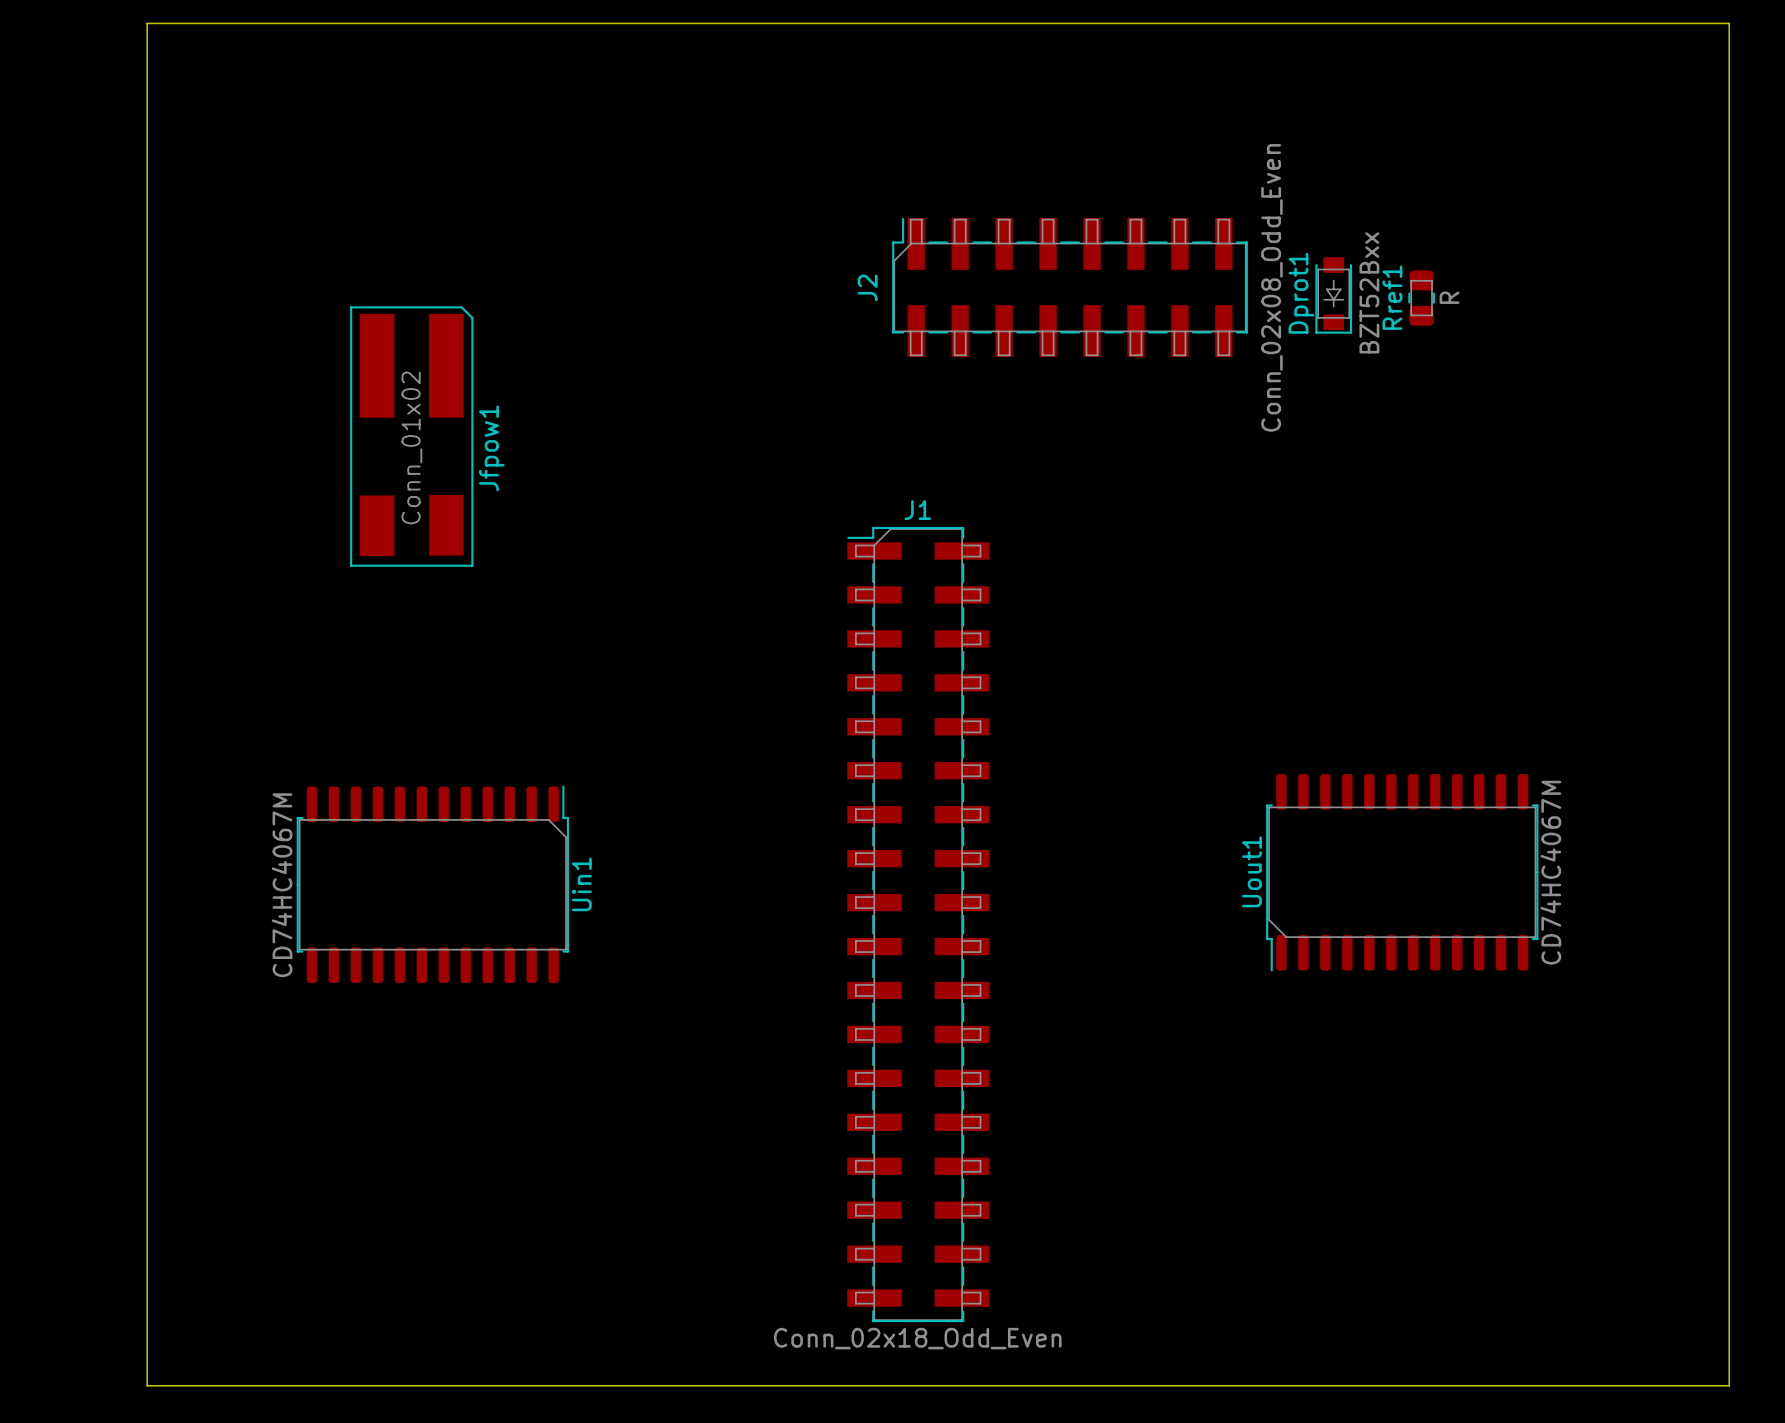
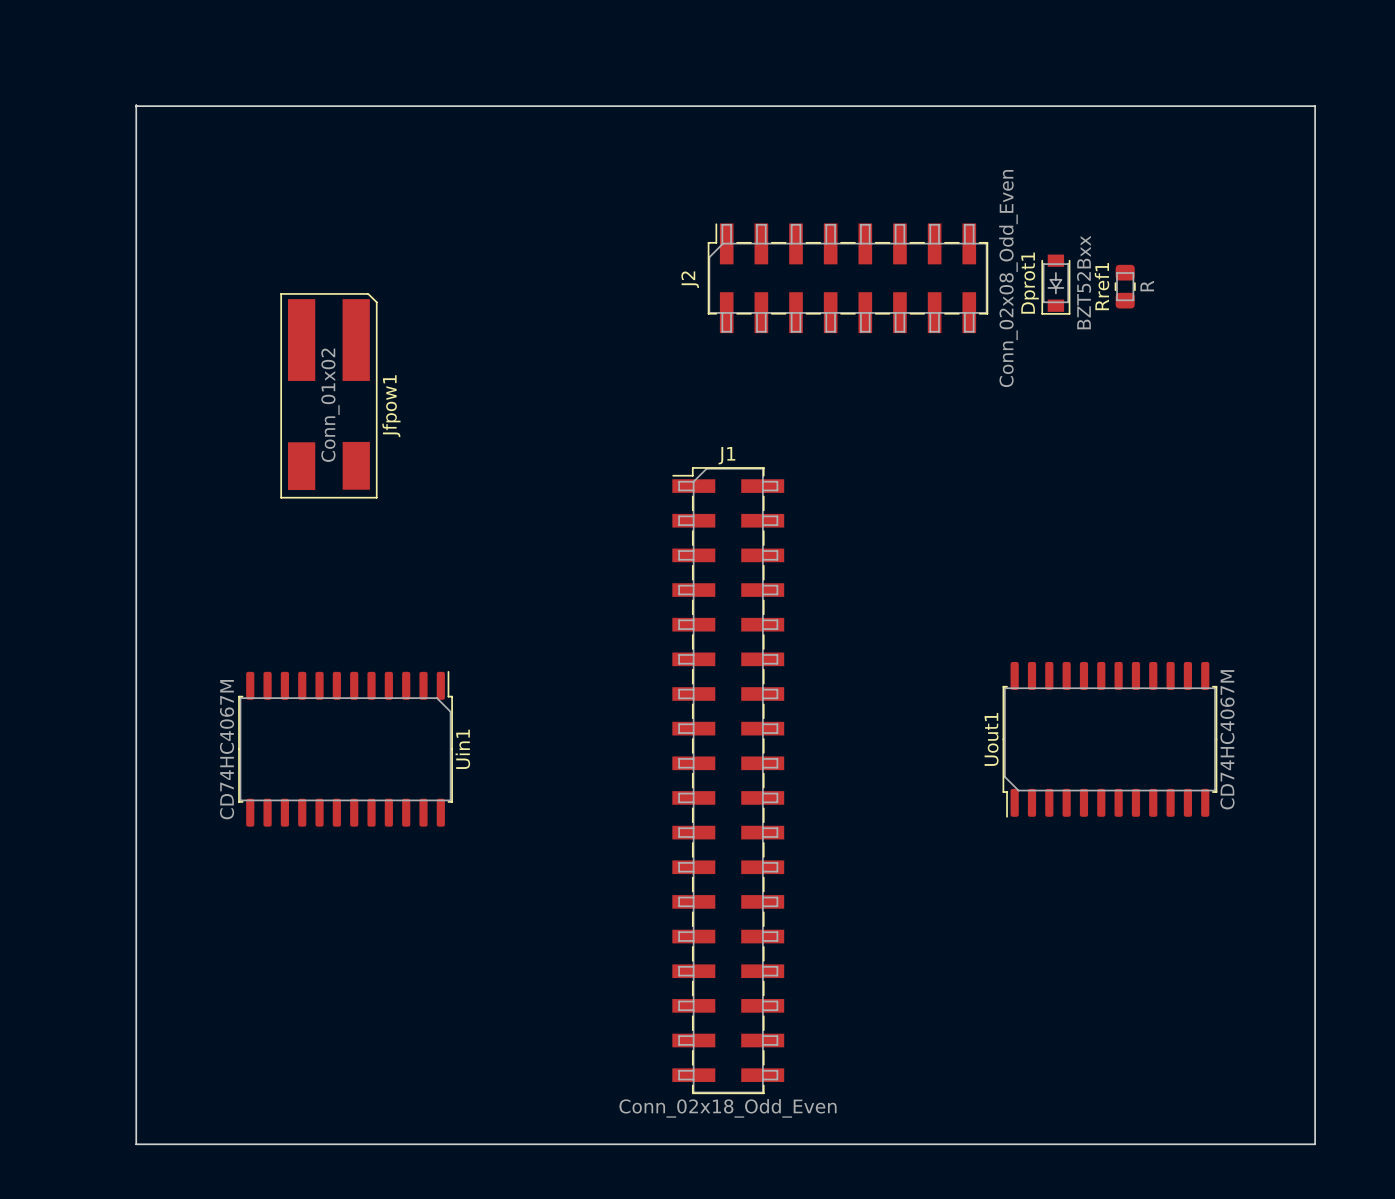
board edge: none -> (136, 105) (136, 1144)
board edge: (167, 1385) (147, 1385) (147, 23) (1729, 23) (1729, 1385) (1662, 1385) -> (136, 106) (1315, 106) (1315, 1144)

